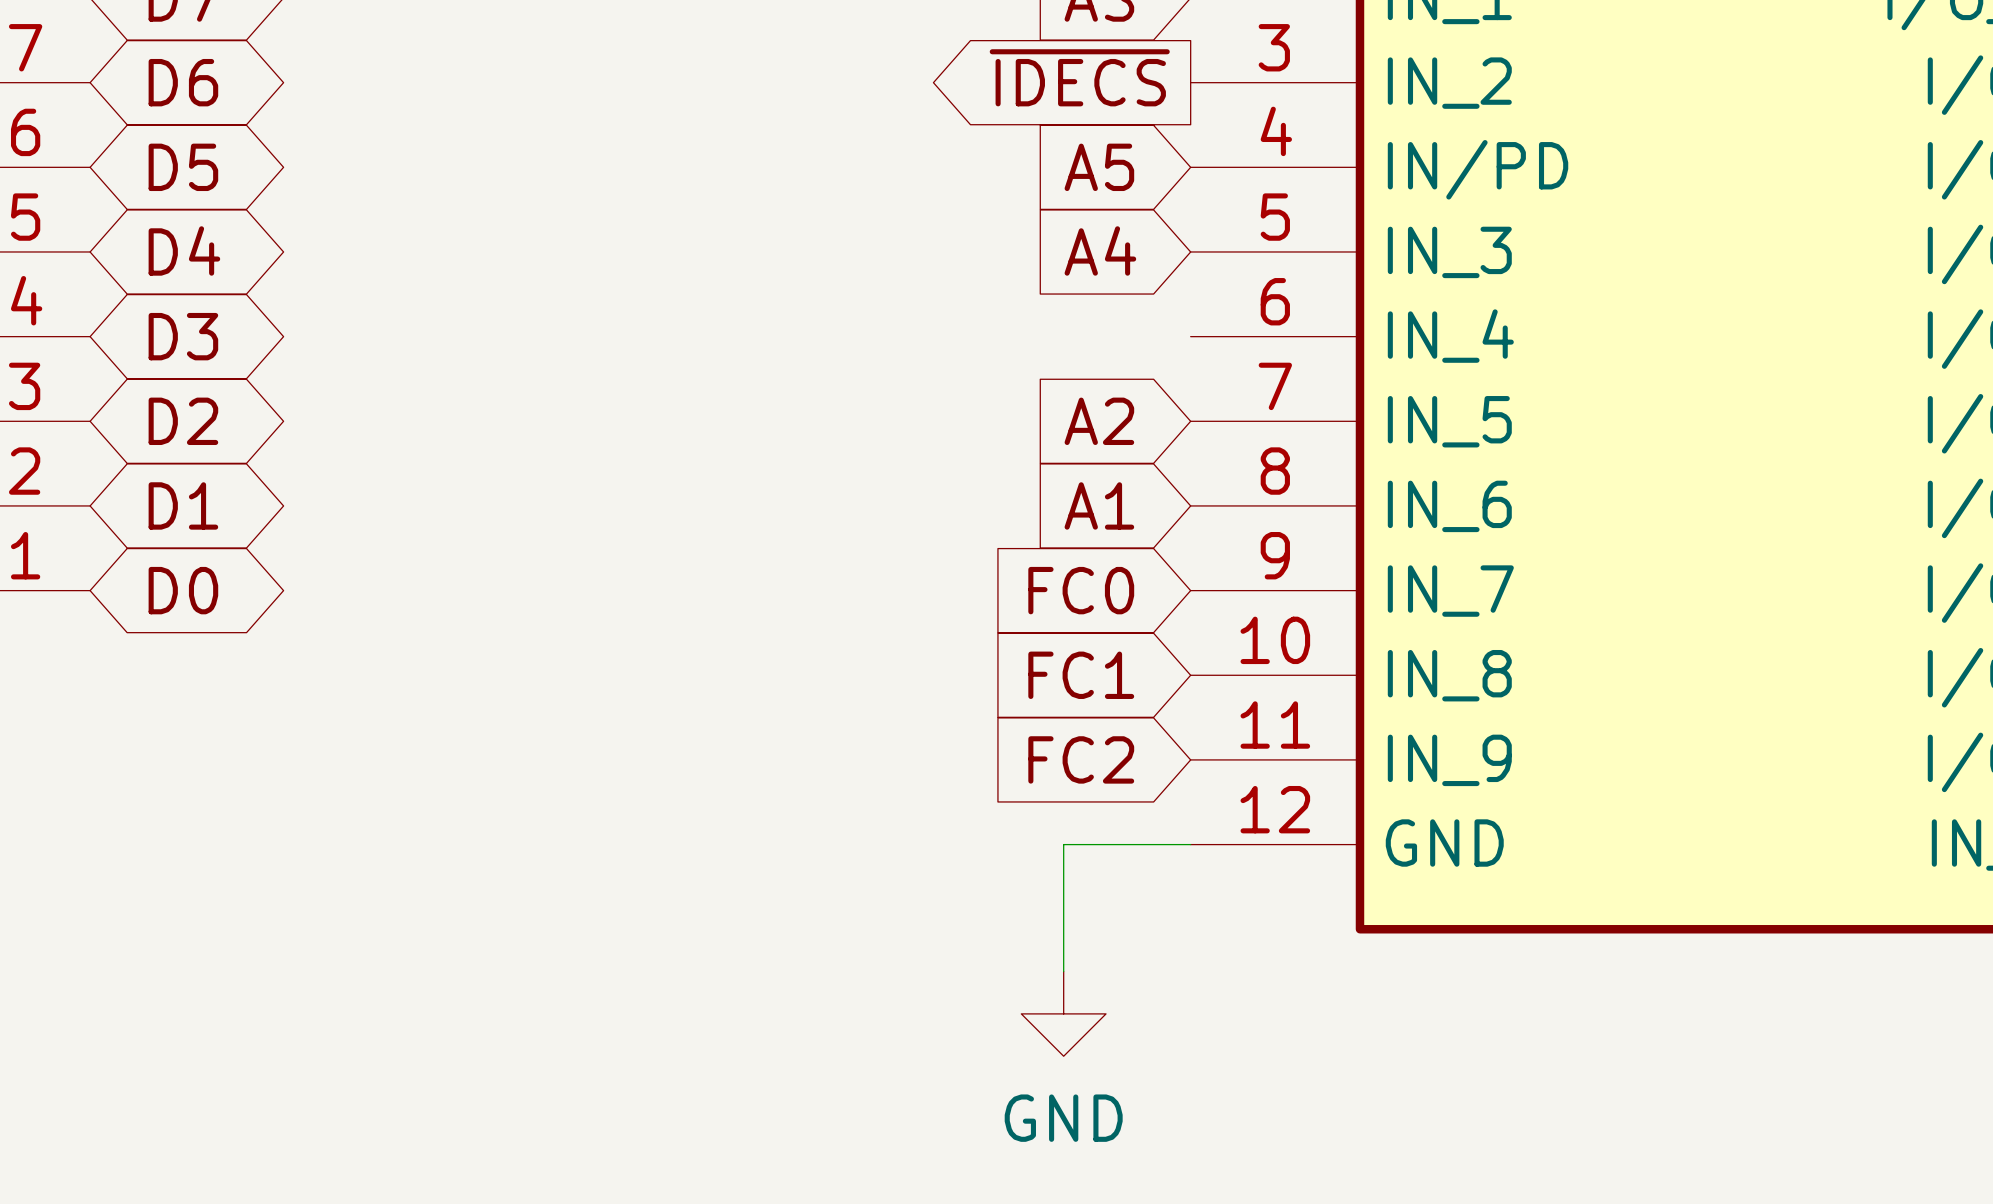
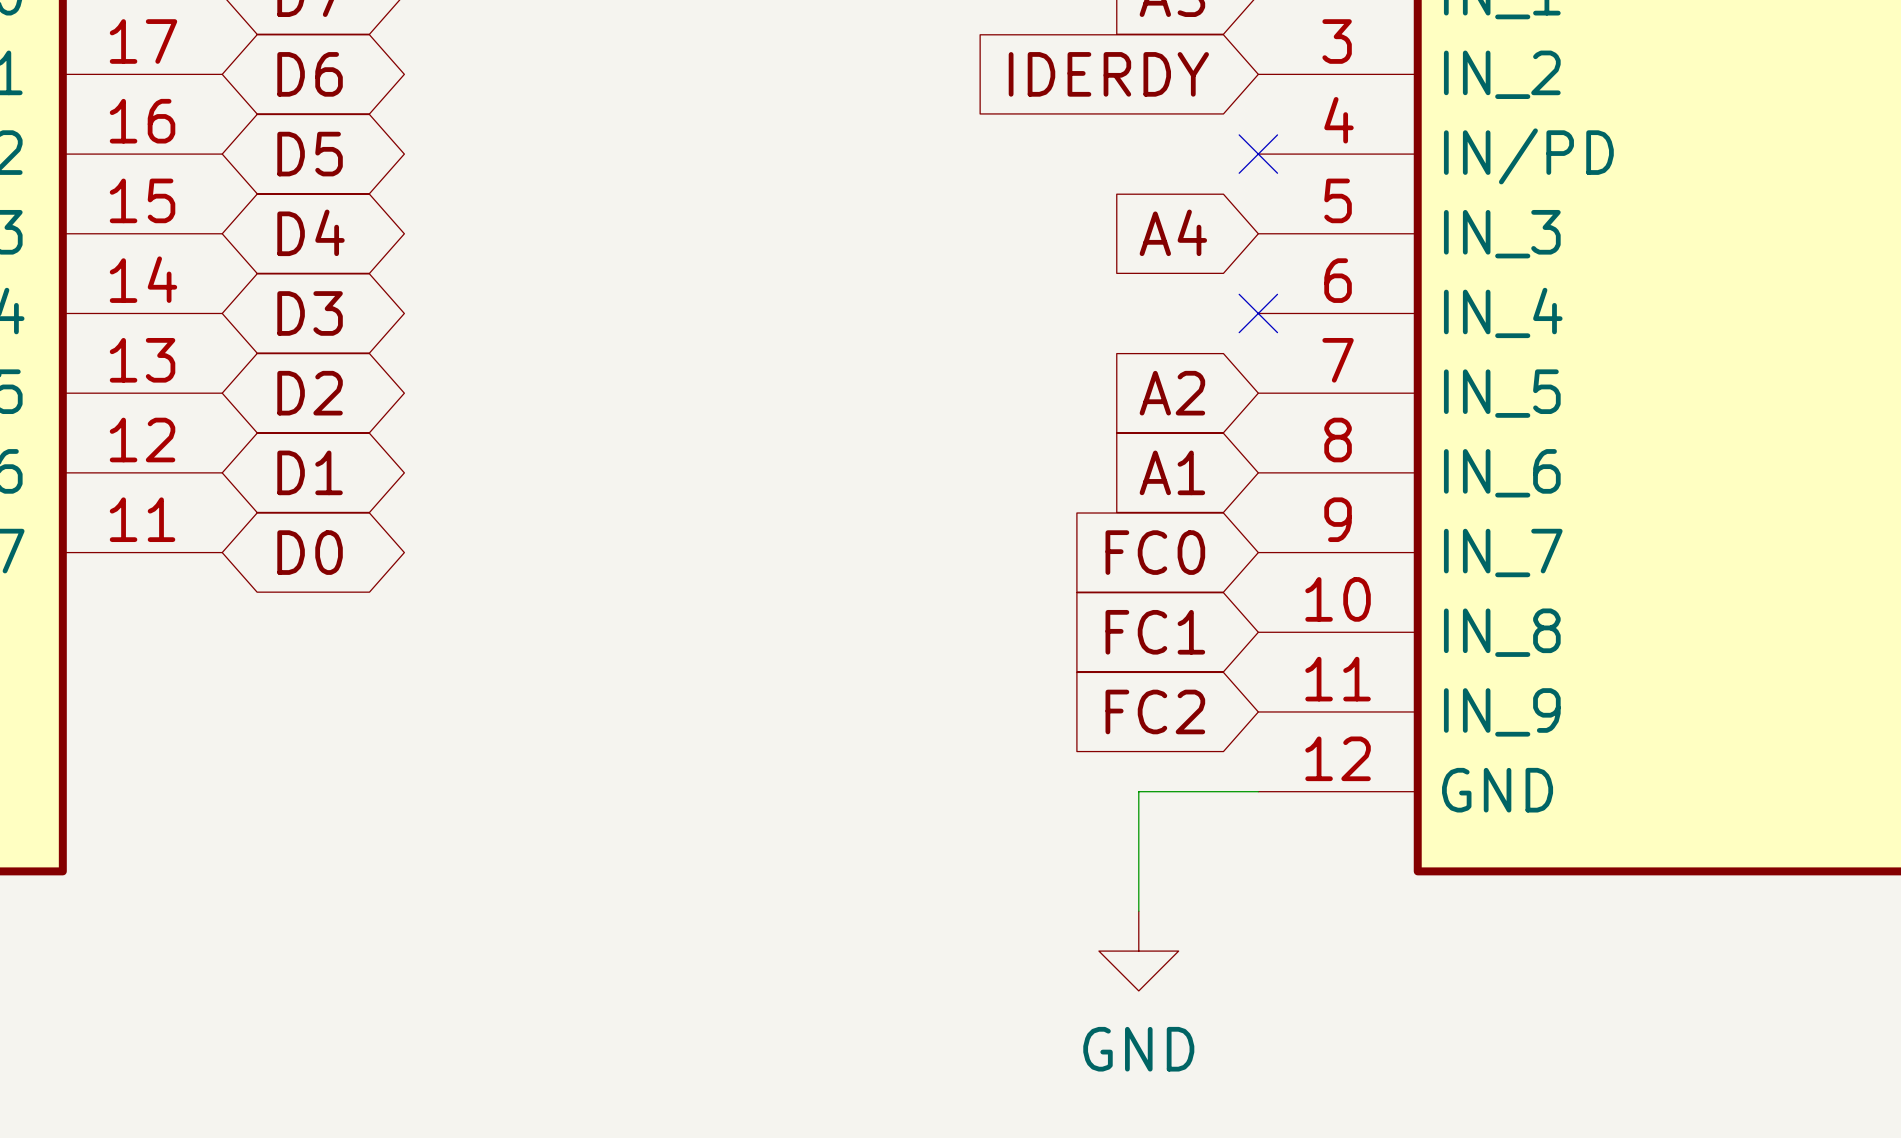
global label shape: output (1079, 77) -> input (1108, 74)
global label: ~{IDECS} (1079, 77) -> IDERDY (1108, 74)
global label: A5 (1099, 167) -> none
no-connect mark: none -> (1258, 154)
no-connect mark: none -> (1258, 313)

